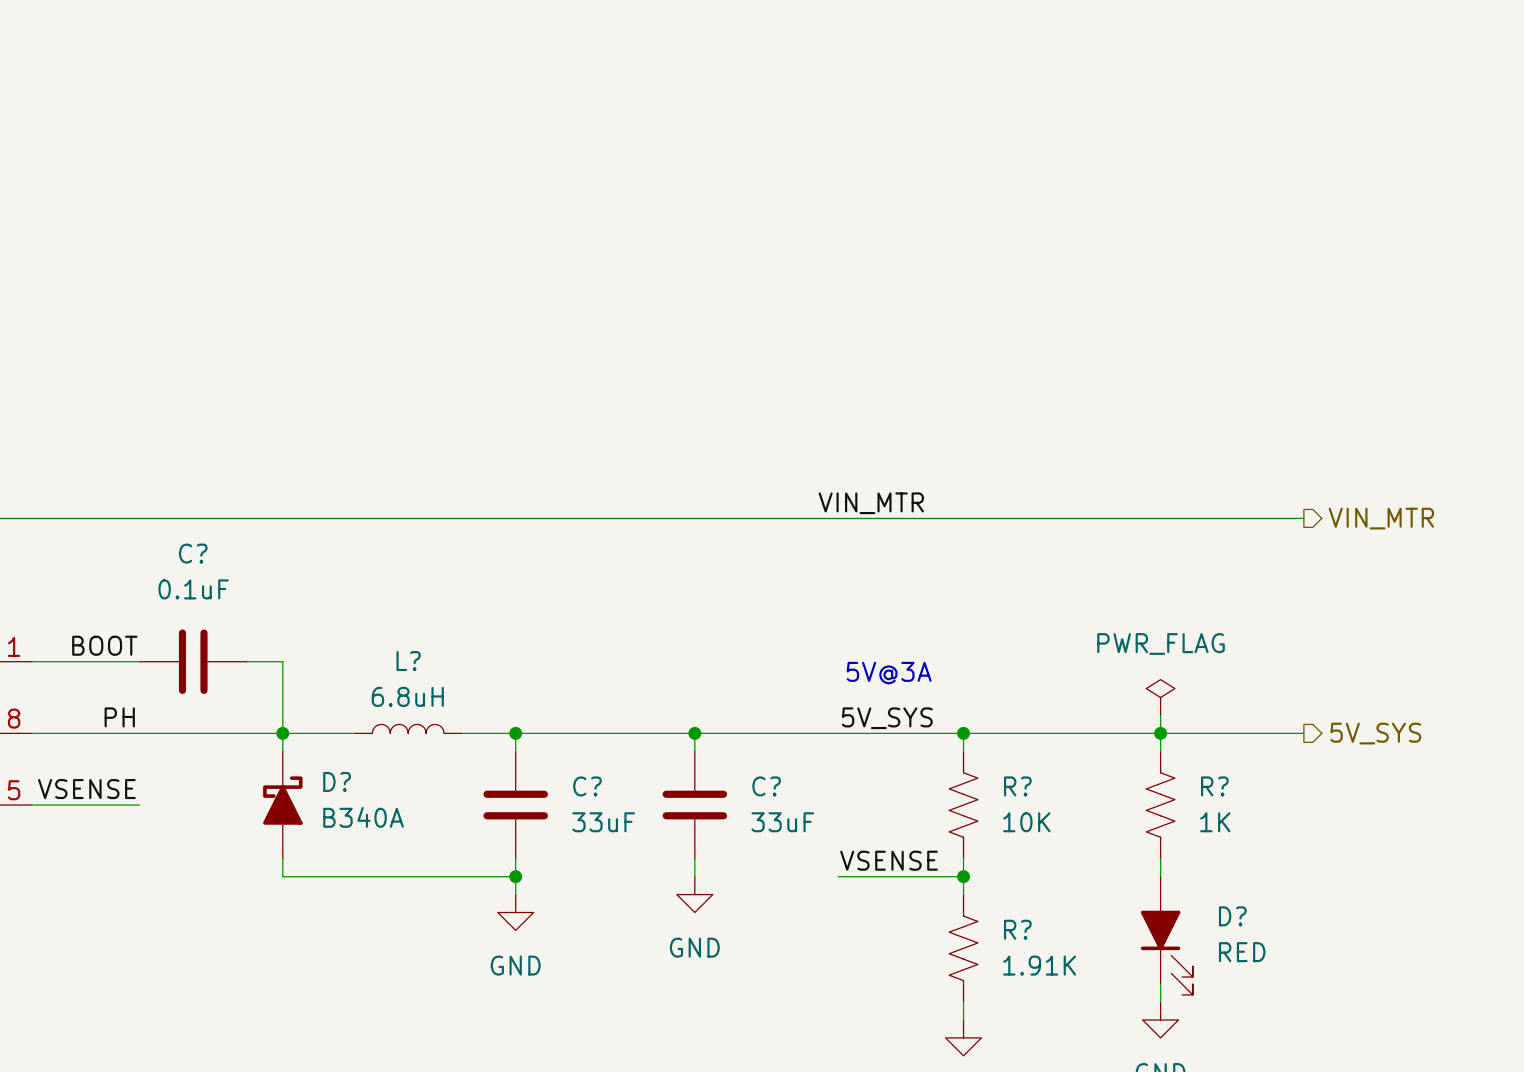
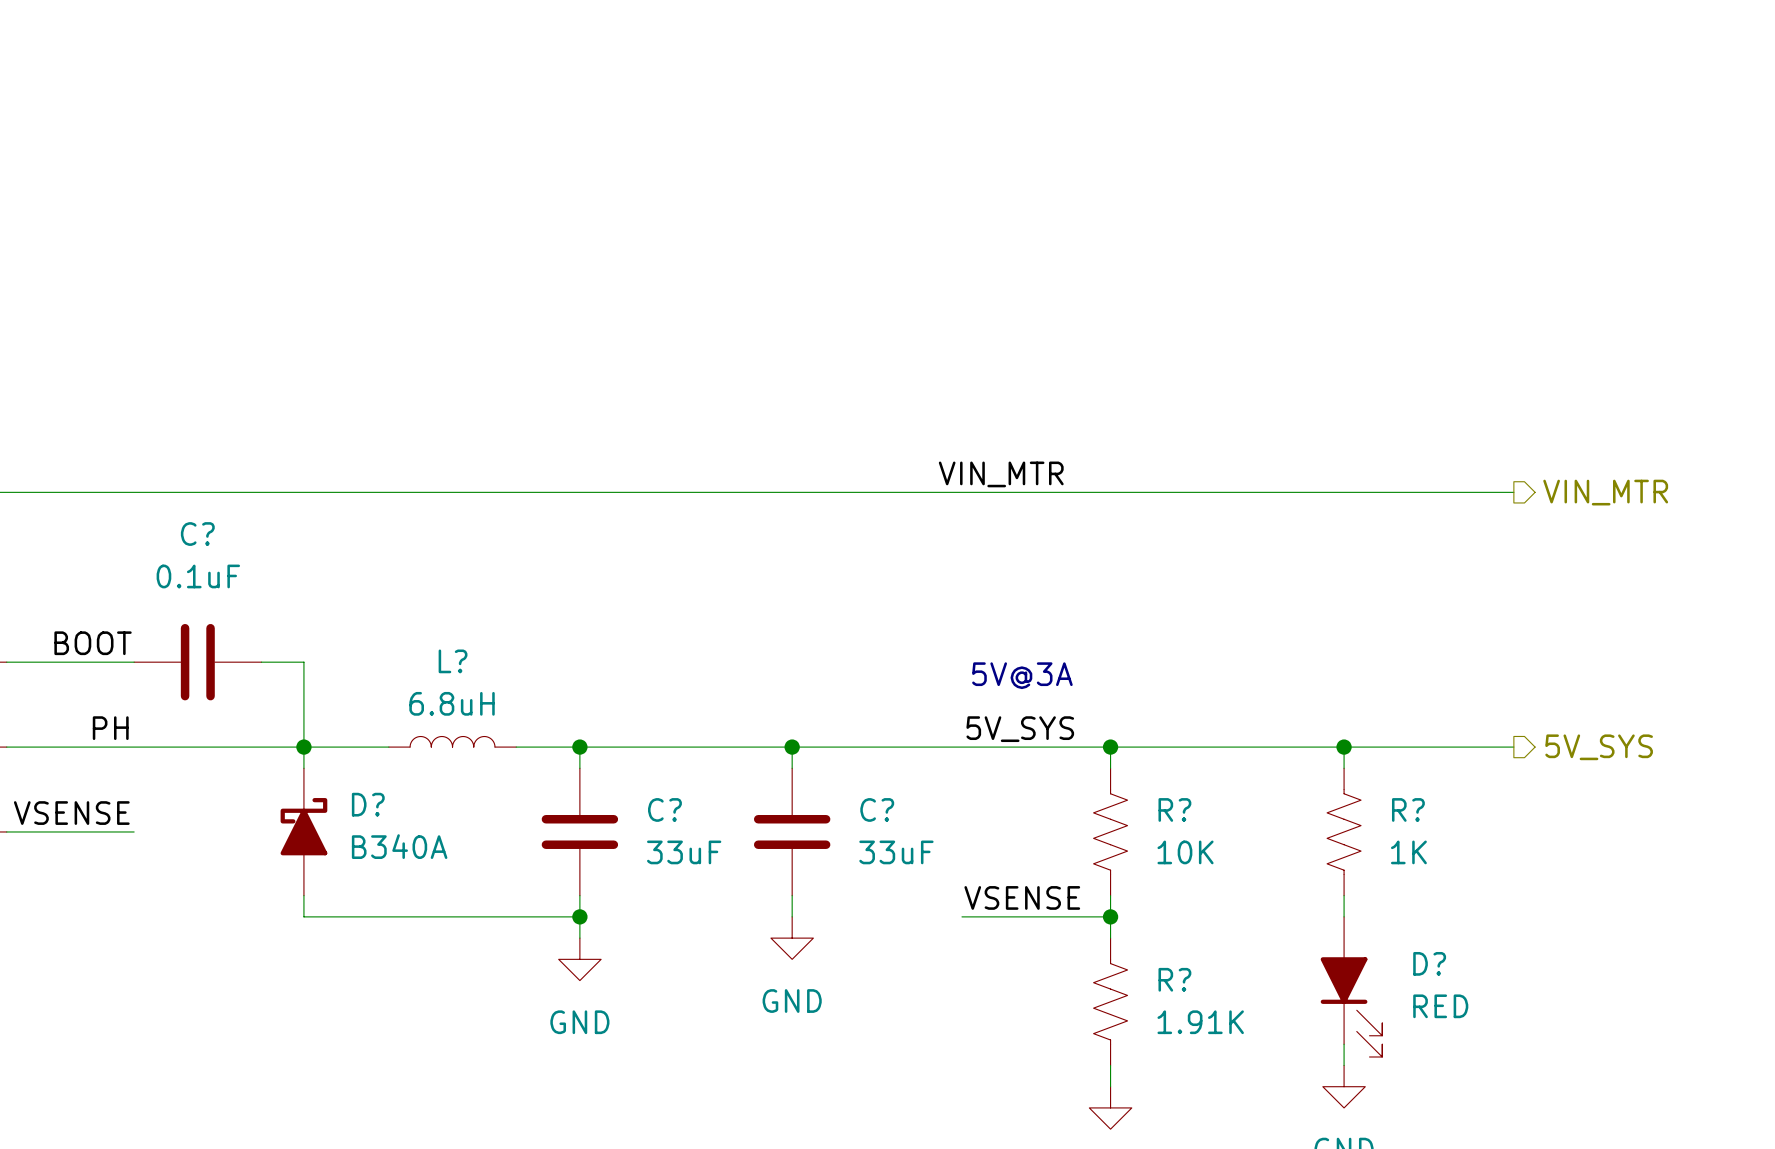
power symbol: PWR_FLAG (1160, 697) -> none
wire: (1160, 715) (1160, 733) -> none

